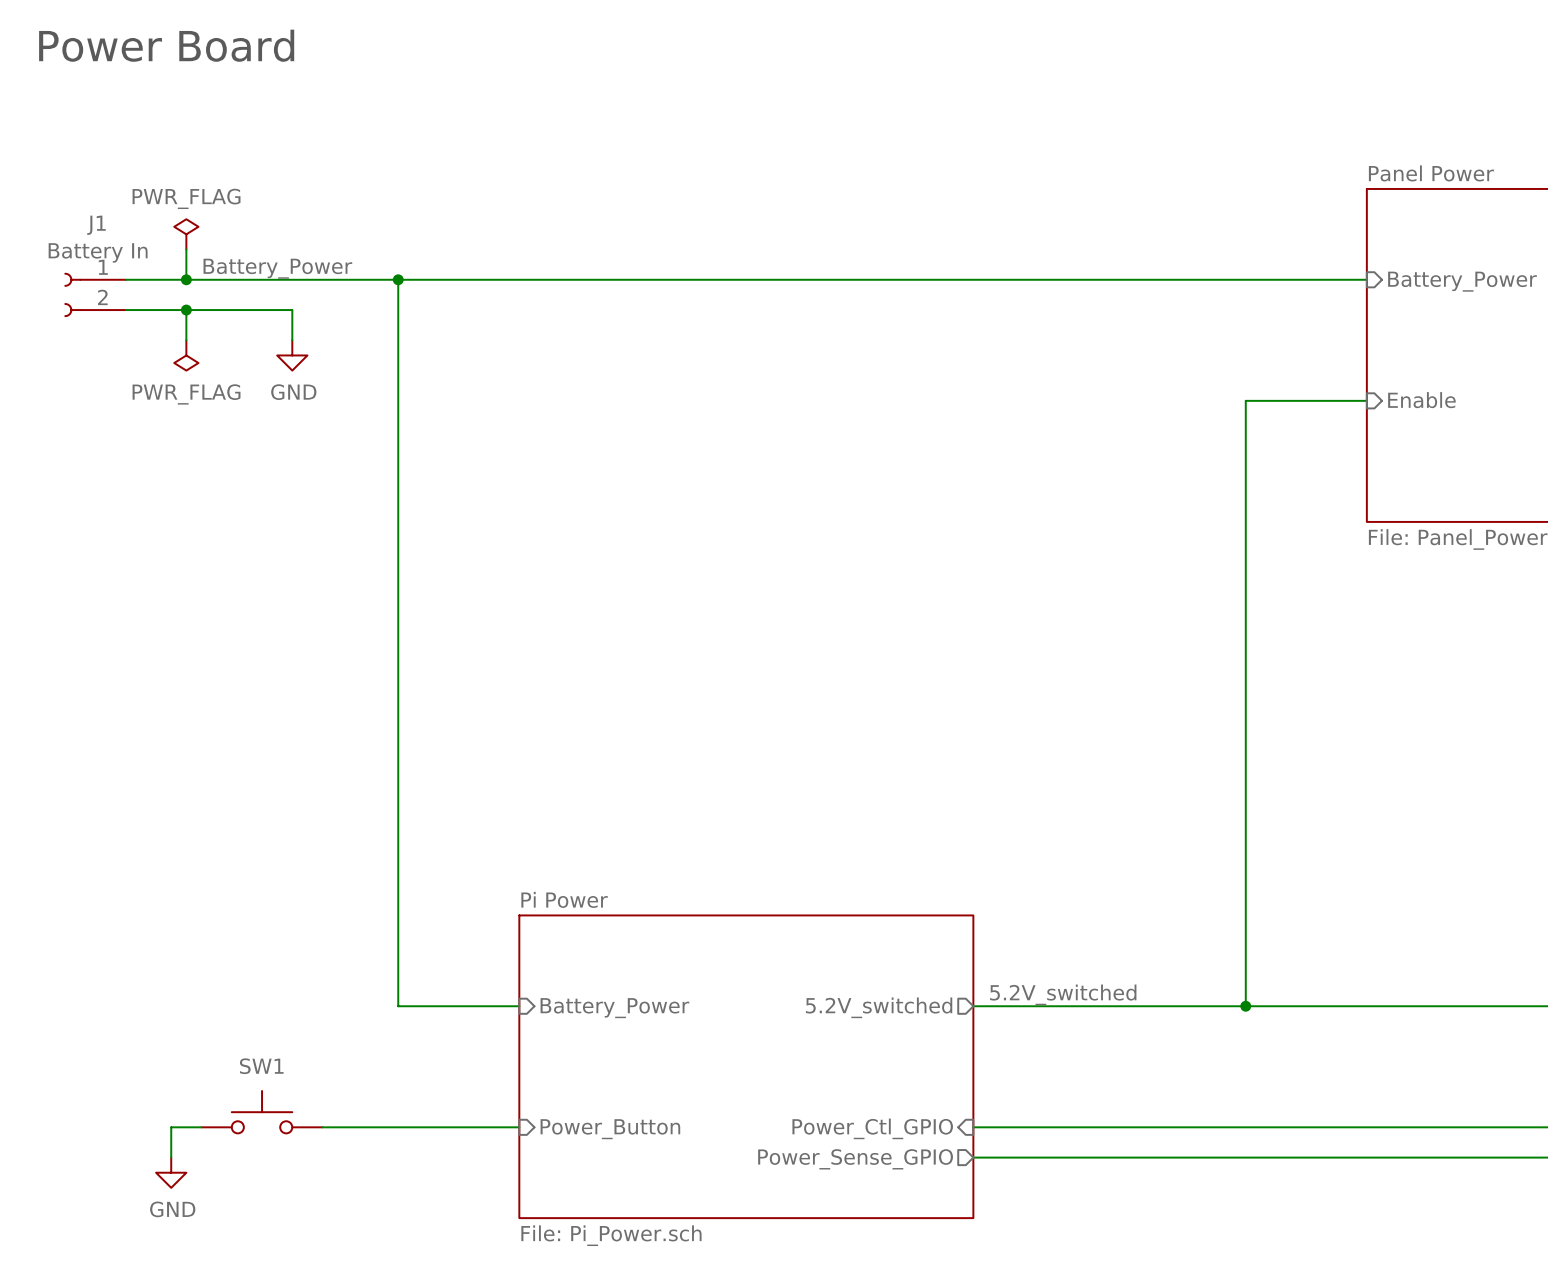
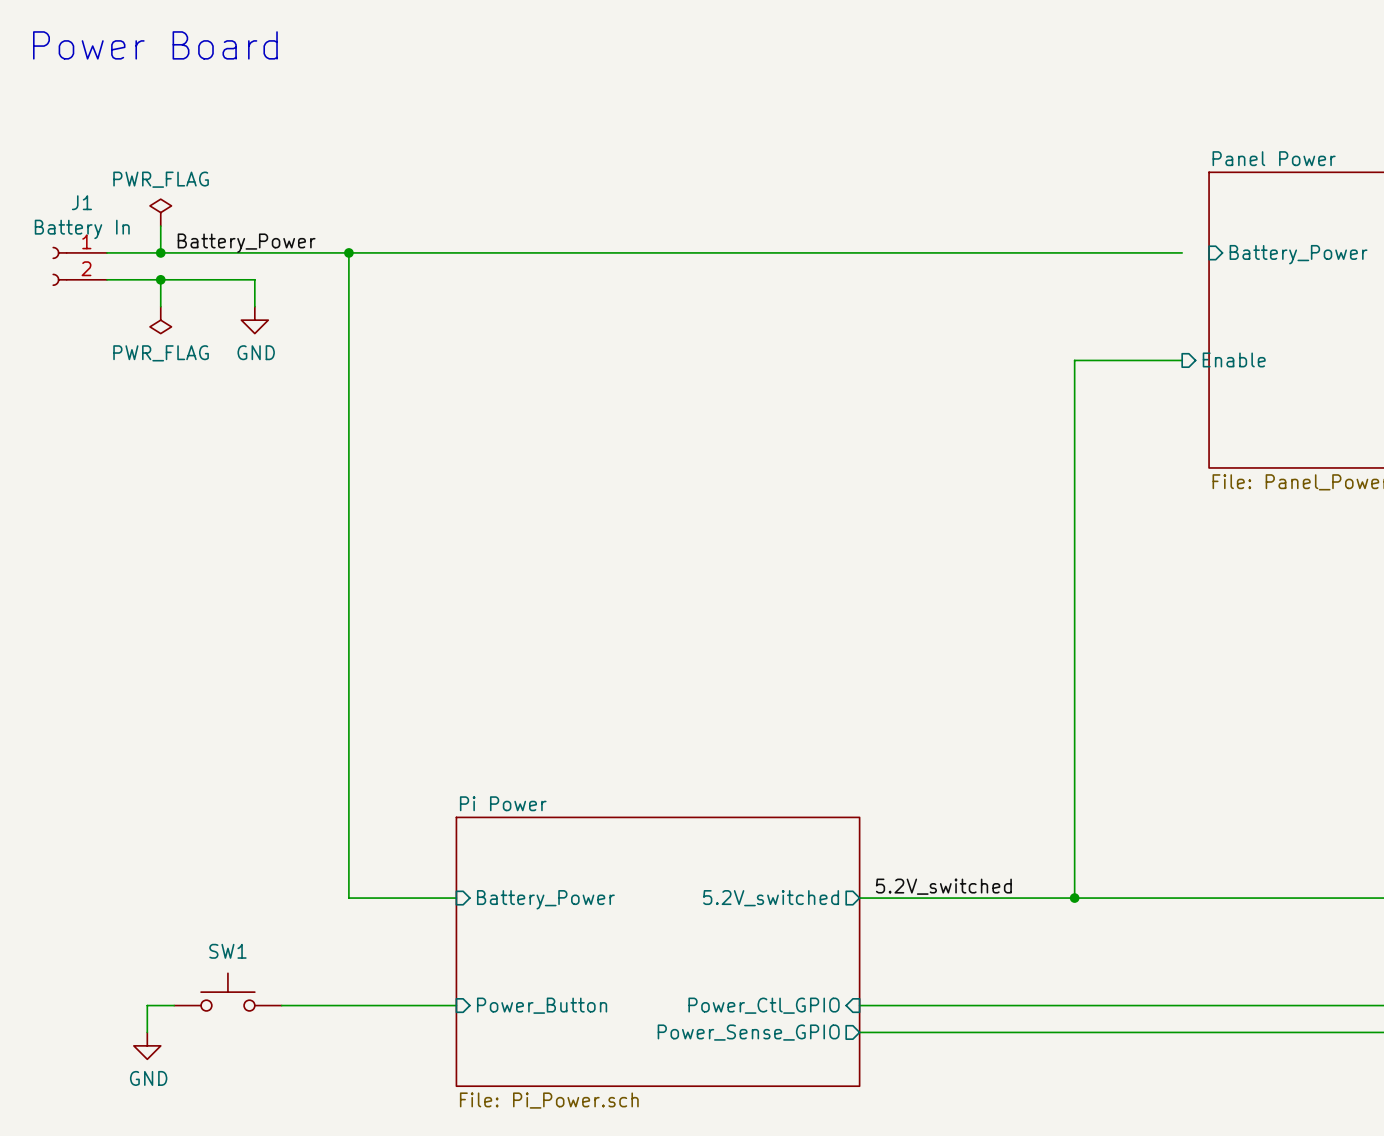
wire: (1336, 279) (1366, 279) -> none
wire: (1245, 400) (1245, 1006) -> (1101, 360) (1074, 360) (1074, 898)
wire: (1336, 400) (1366, 400) -> none
sheet pin position: Enable (1421, 400) -> Enable (1234, 359)
junction position: (1245, 1006) -> (1074, 898)

